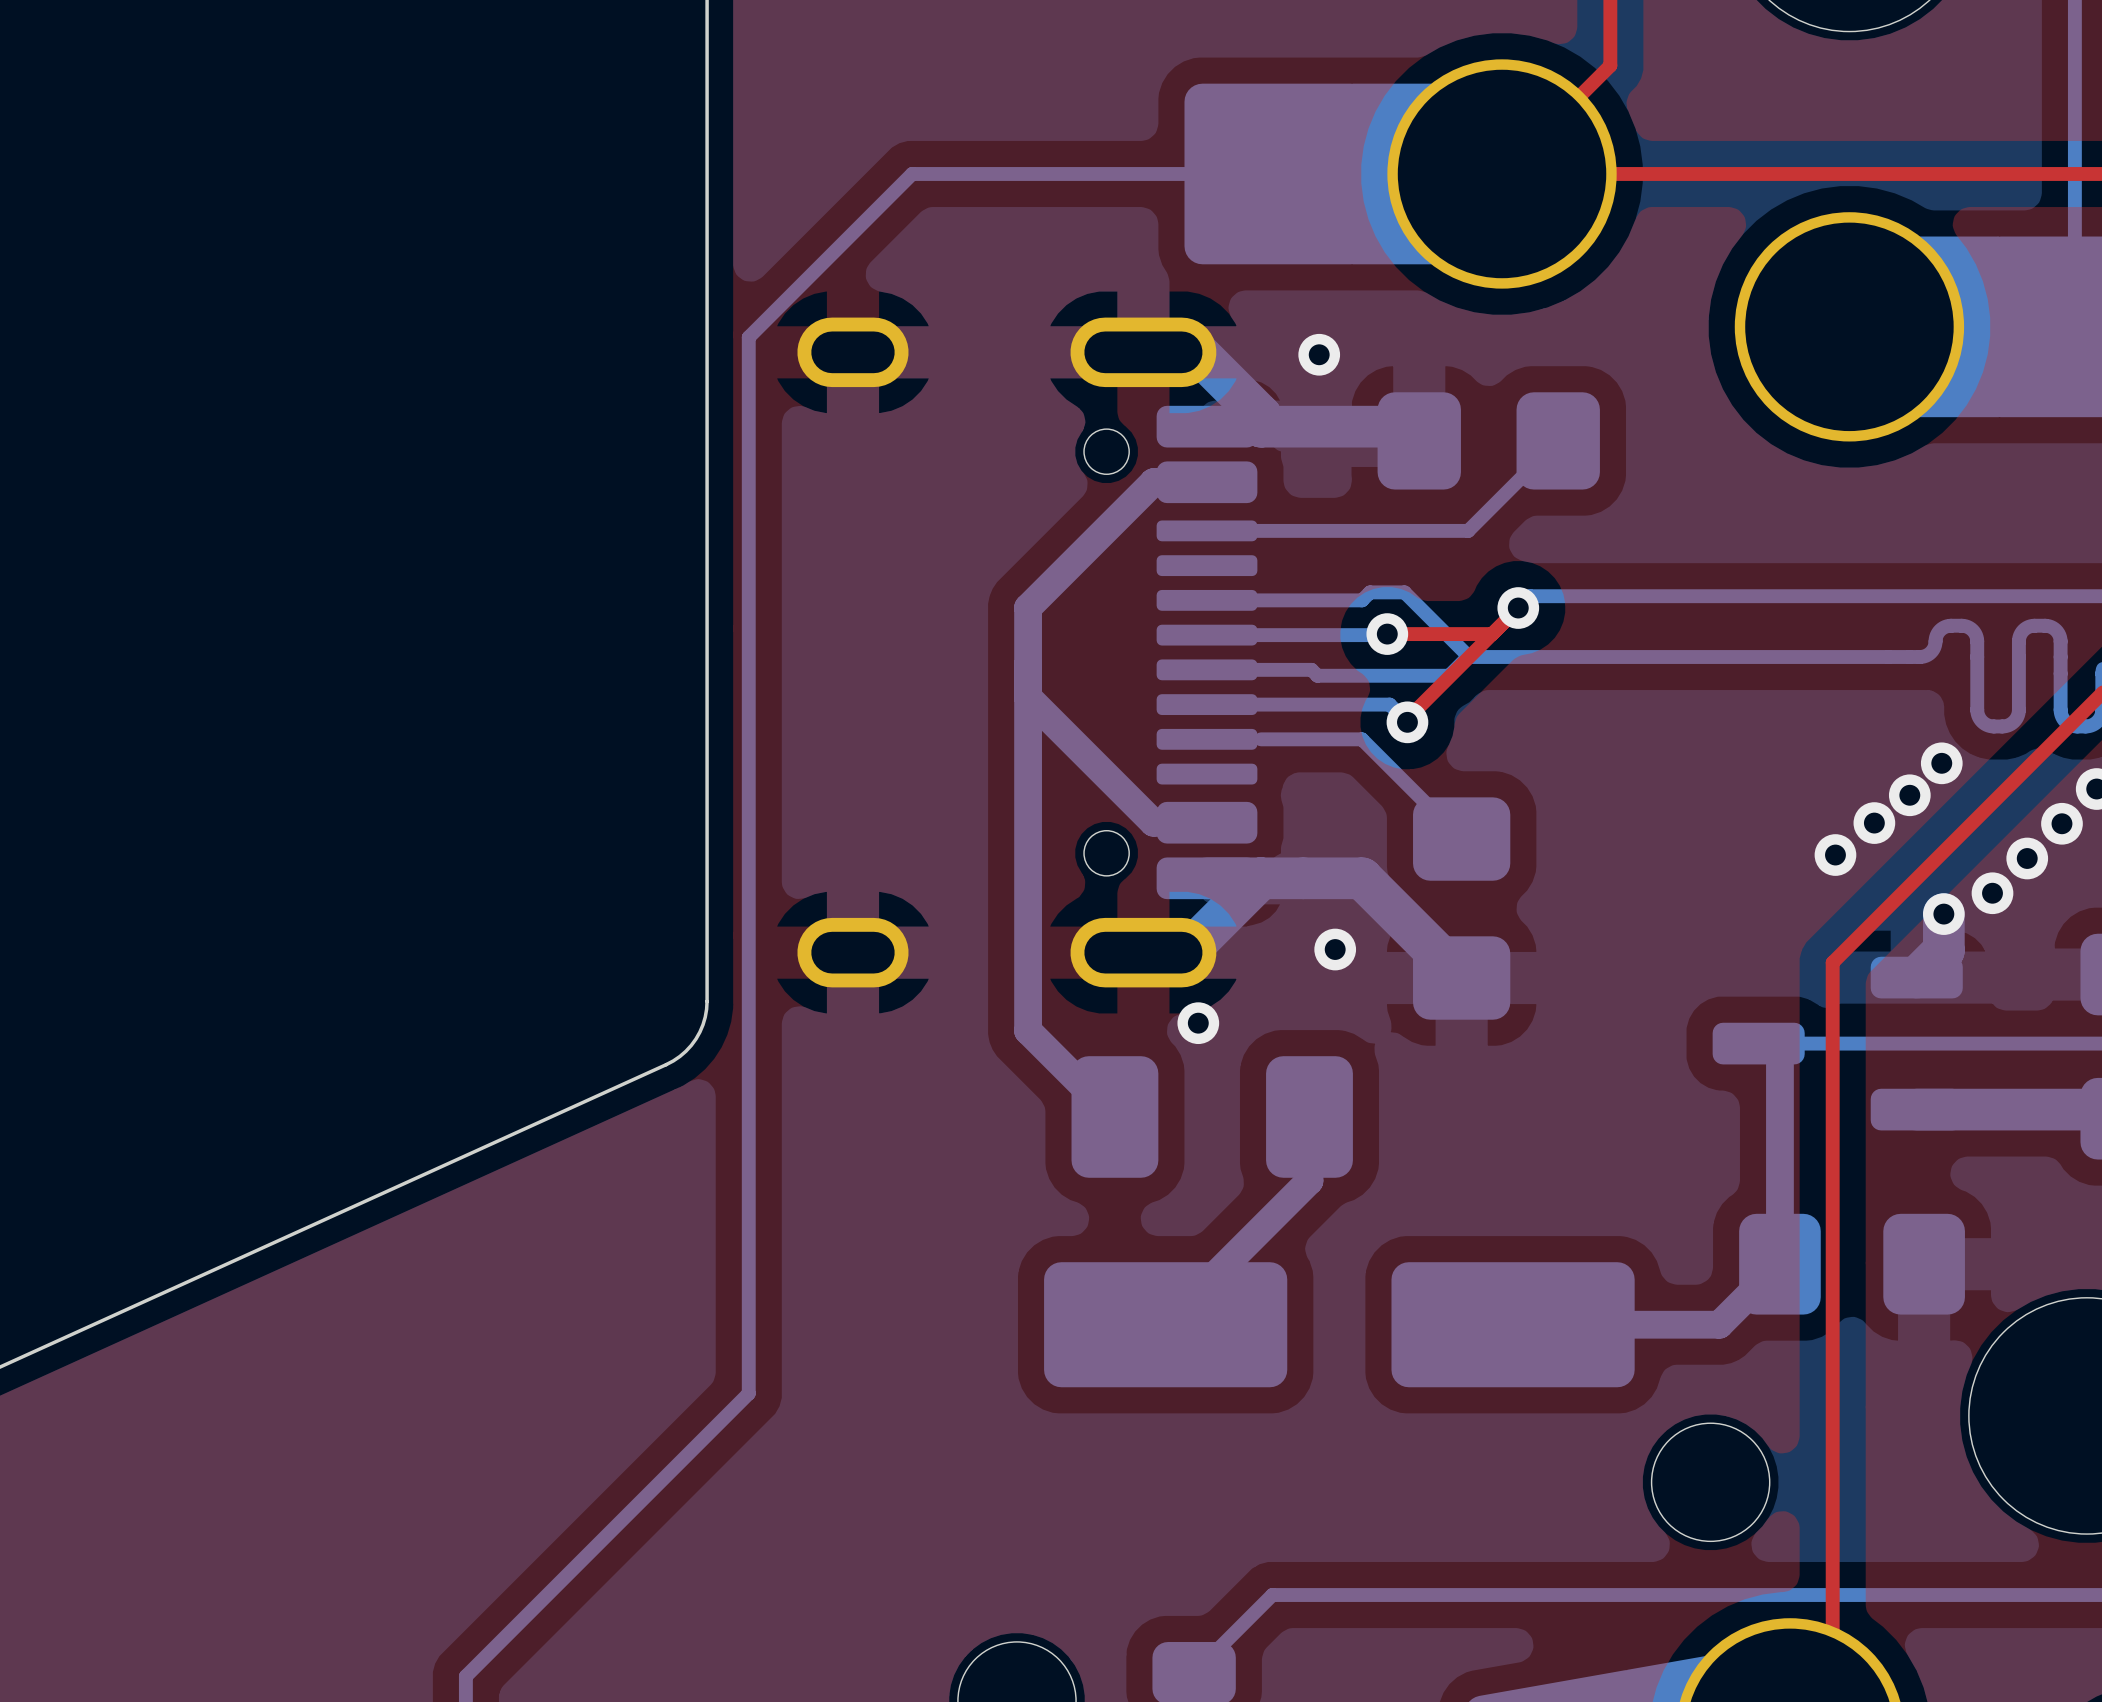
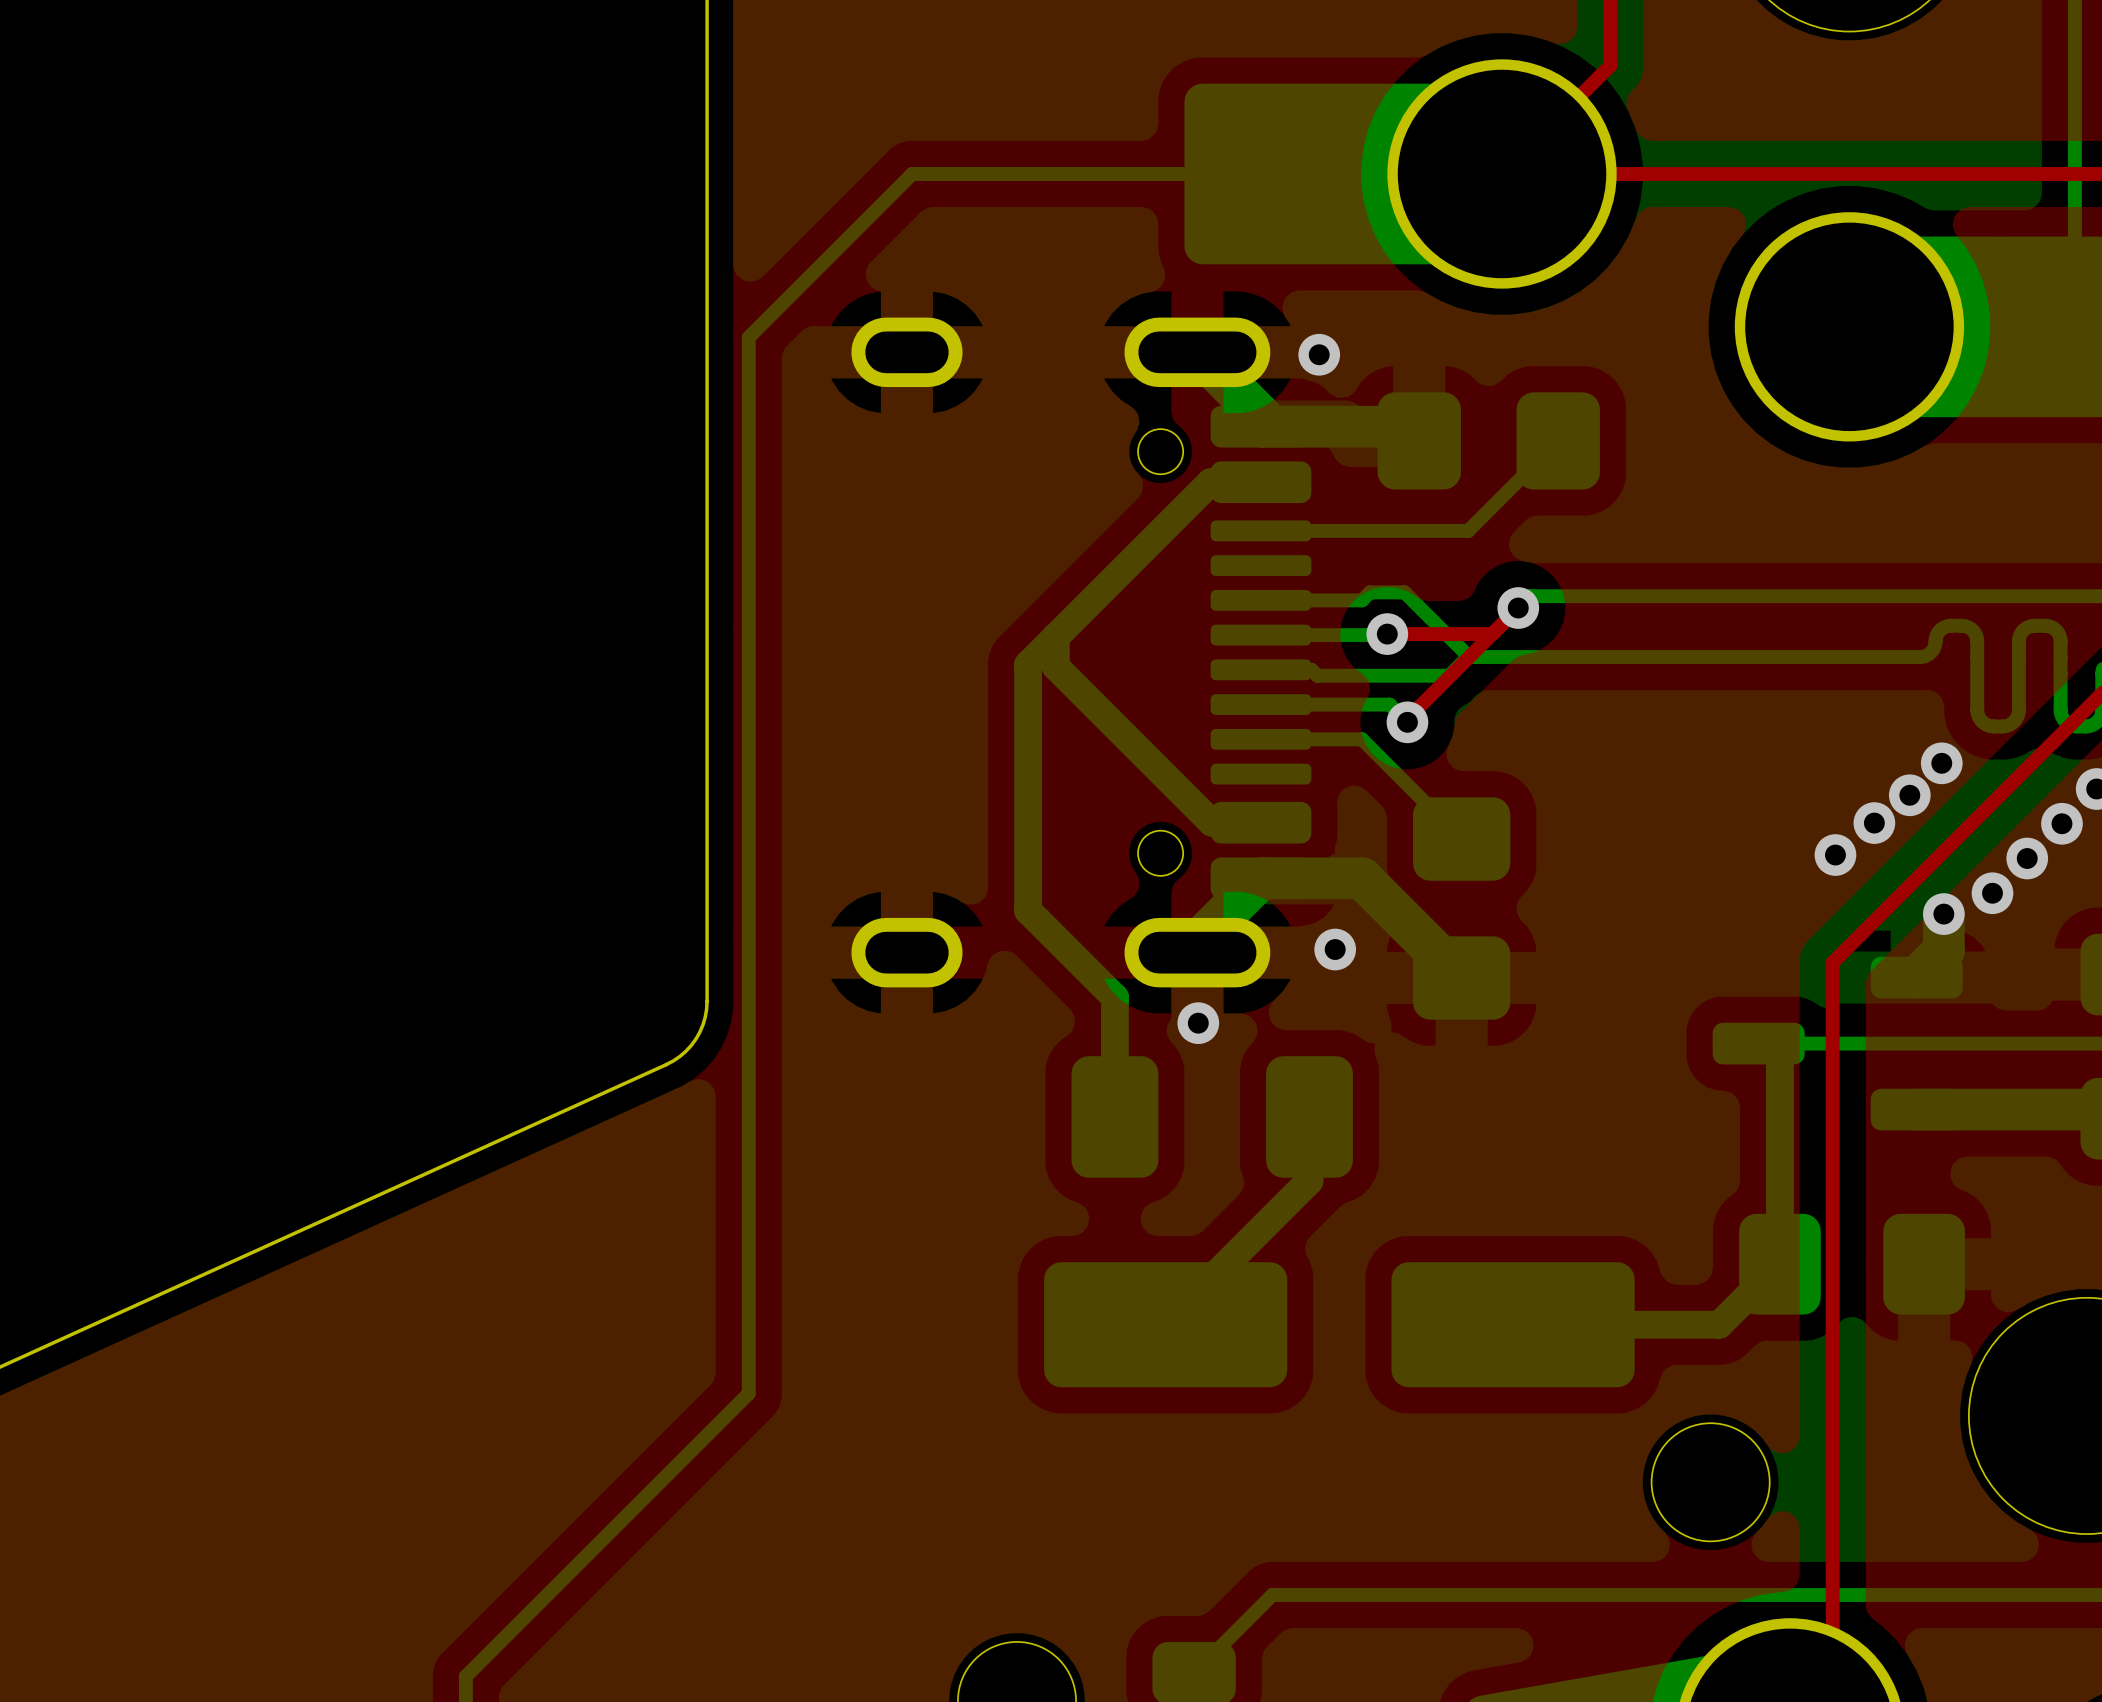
bottom track: (1210, 482) (1153, 482) (1028, 607) (1028, 664) -> (1210, 482) (1028, 664)
bottom track: none -> (1055, 636) (1055, 666) (1211, 822) (1260, 822)
part position: (1027, 652) -> (1081, 652)
bottom track: (1028, 697) (1153, 822) (1207, 822) -> none
bottom track: (1028, 910) (1028, 1030) (1114, 1116) -> (1028, 910) (1114, 997) (1114, 1116)

